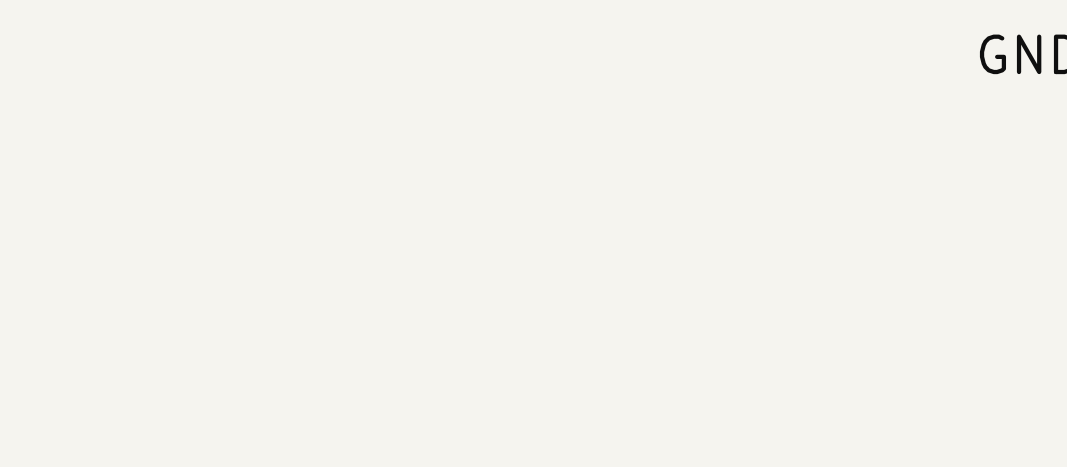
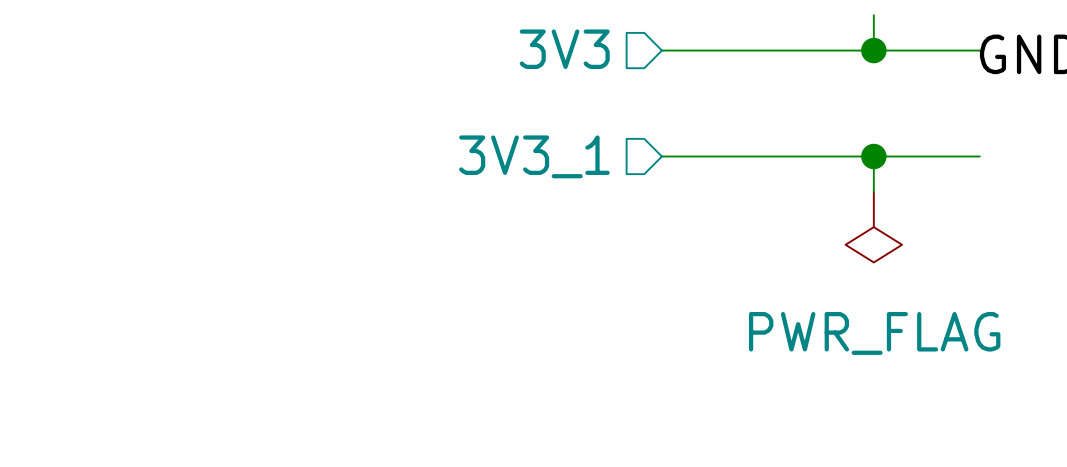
wire: none -> (873, 15) (873, 50)
sheet pin: none -> 3V3 (564, 49)
wire: none -> (661, 50) (979, 50)
junction: none -> (873, 50)
sheet pin: none -> 3V3_1 (534, 156)
wire: none -> (661, 156) (979, 156)
wire: none -> (873, 156) (873, 191)
junction: none -> (873, 156)
power symbol: none -> PWR_FLAG (873, 227)

